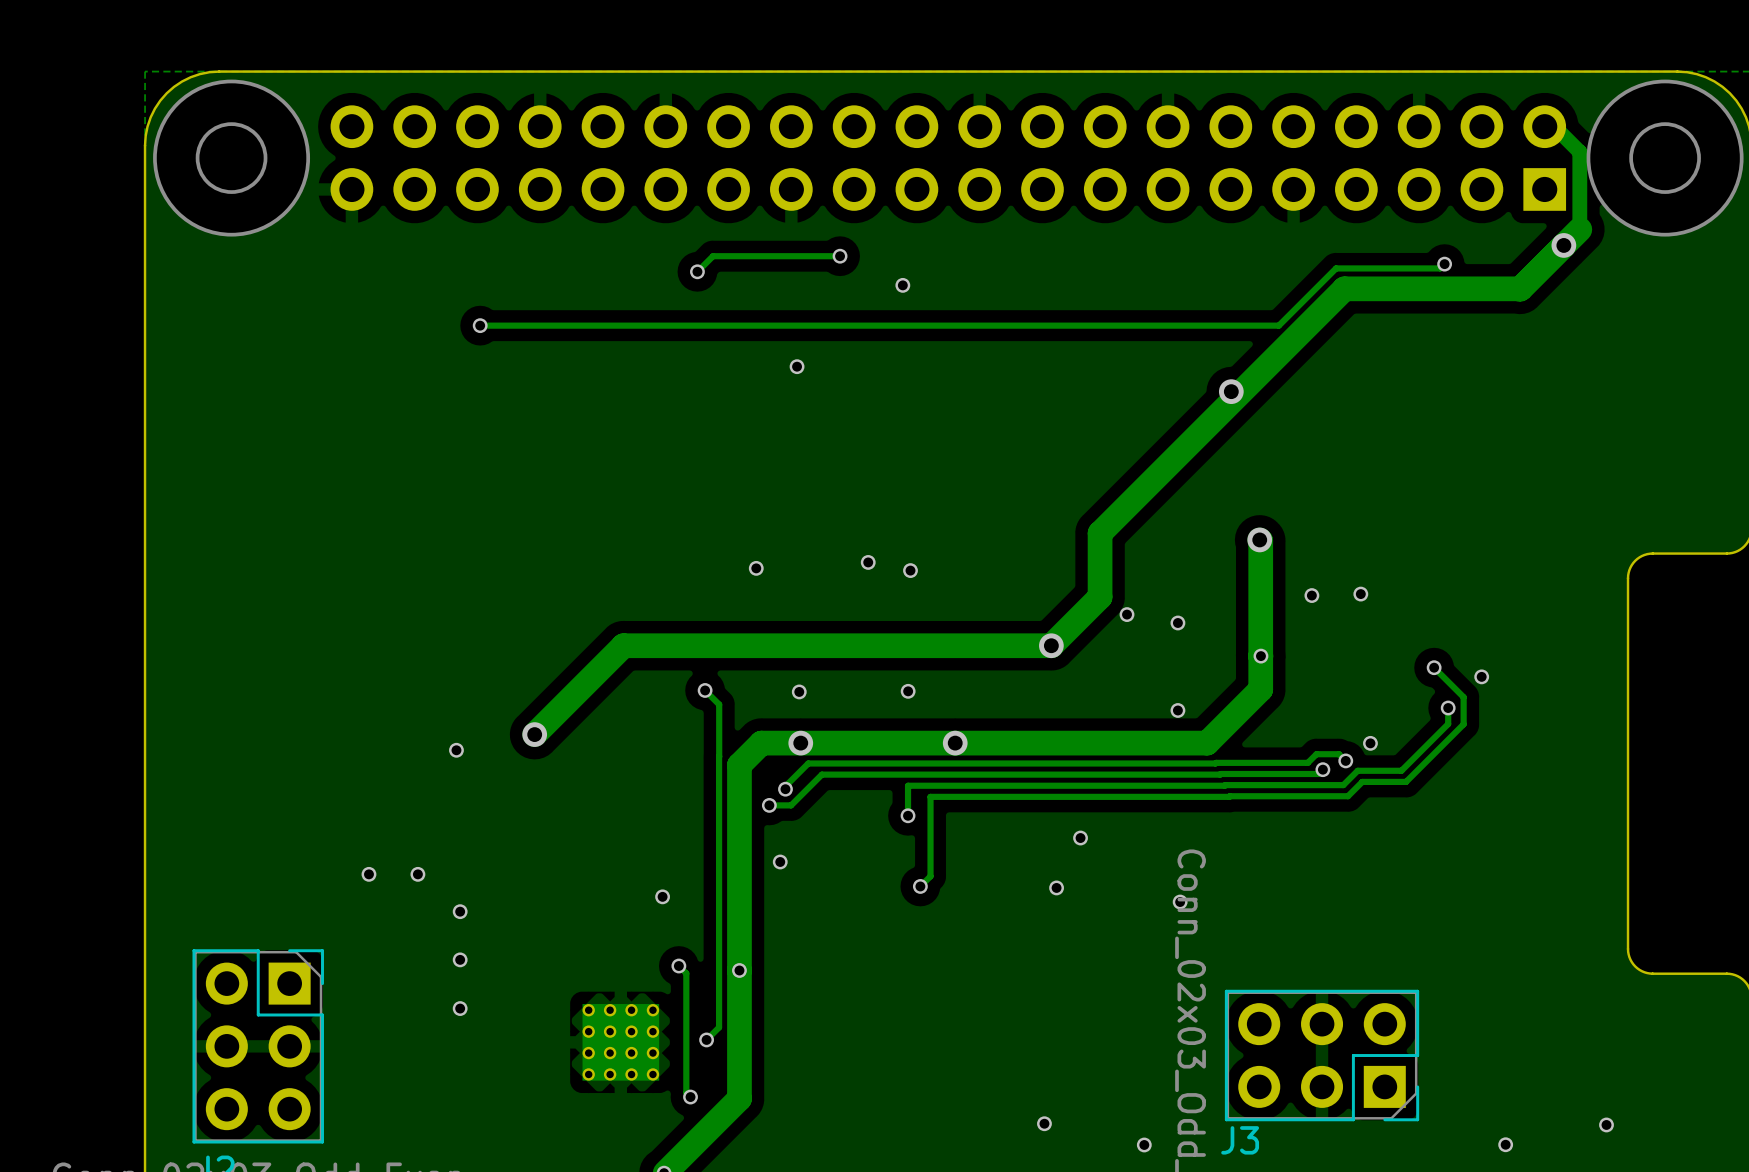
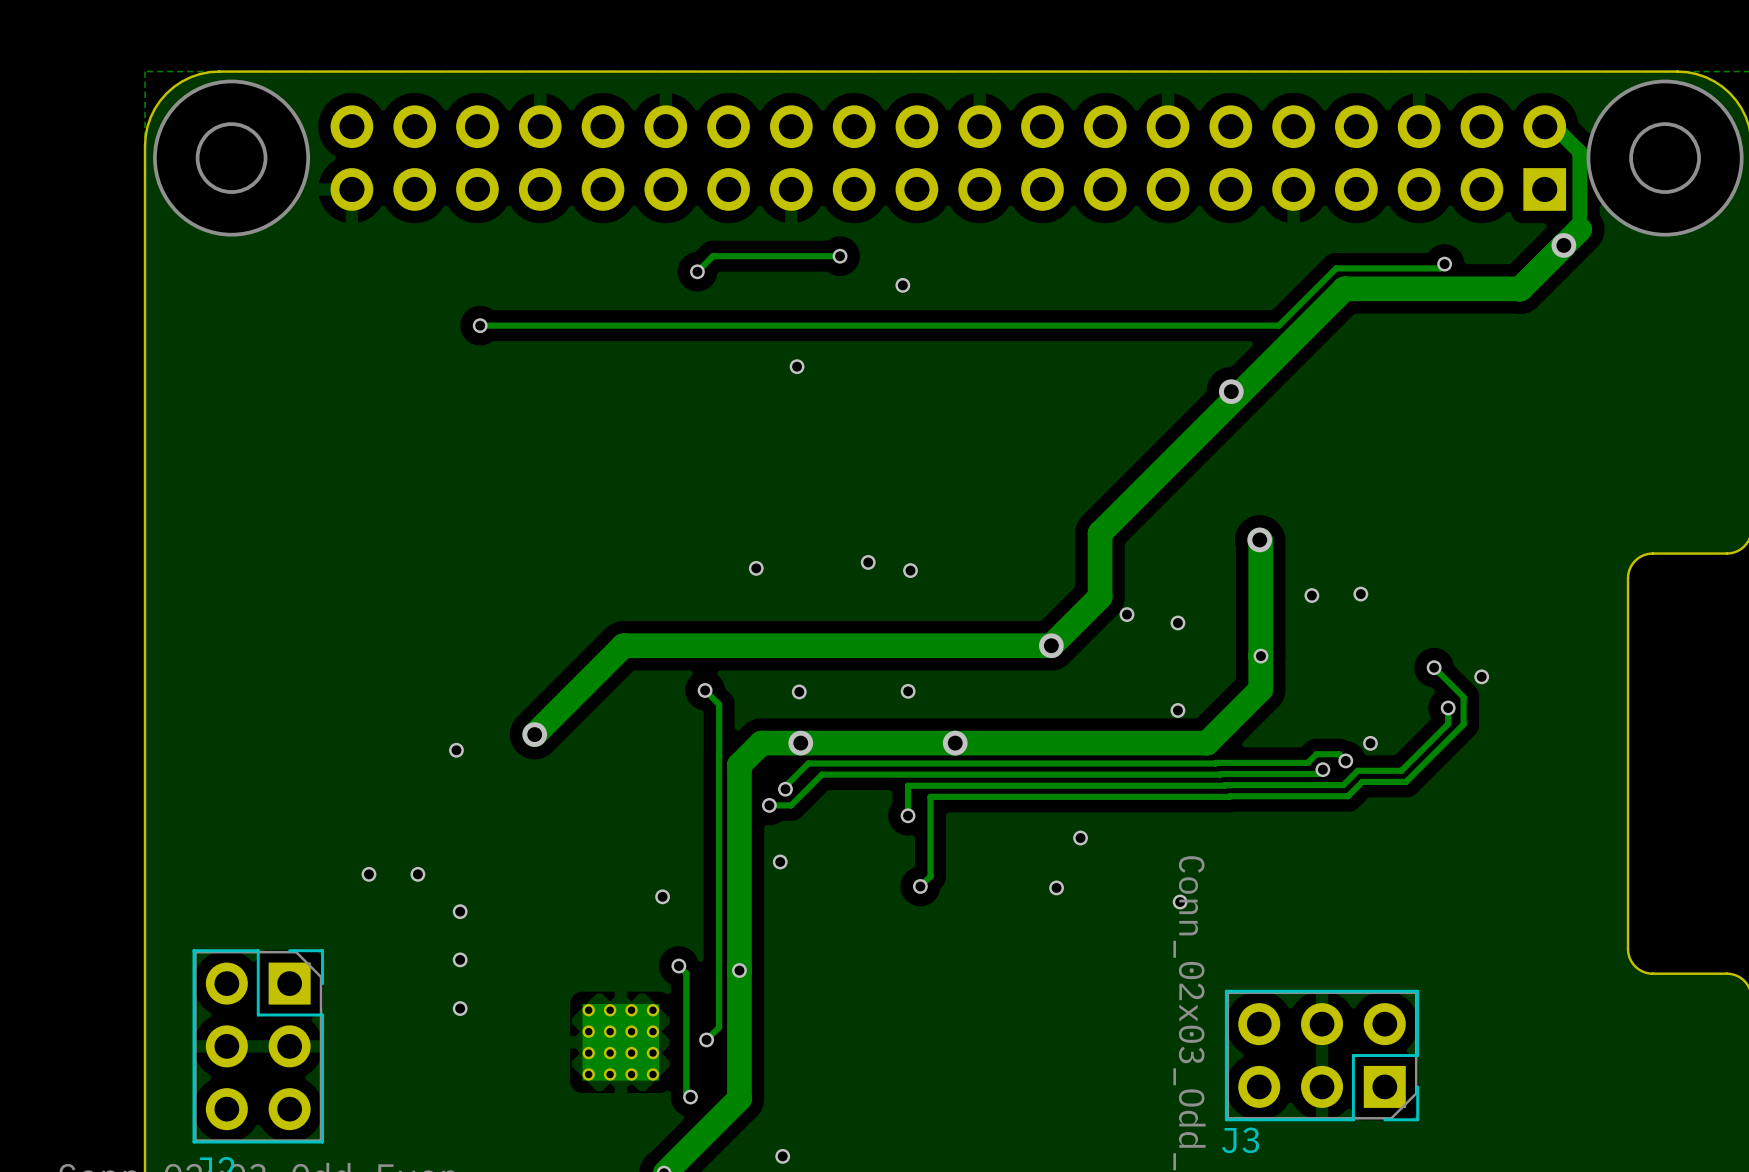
via: (1044, 1123) -> none
via: (1606, 1124) -> none
via: (1144, 1144) -> none
via: (1505, 1144) -> none
via: none -> (782, 1156)

